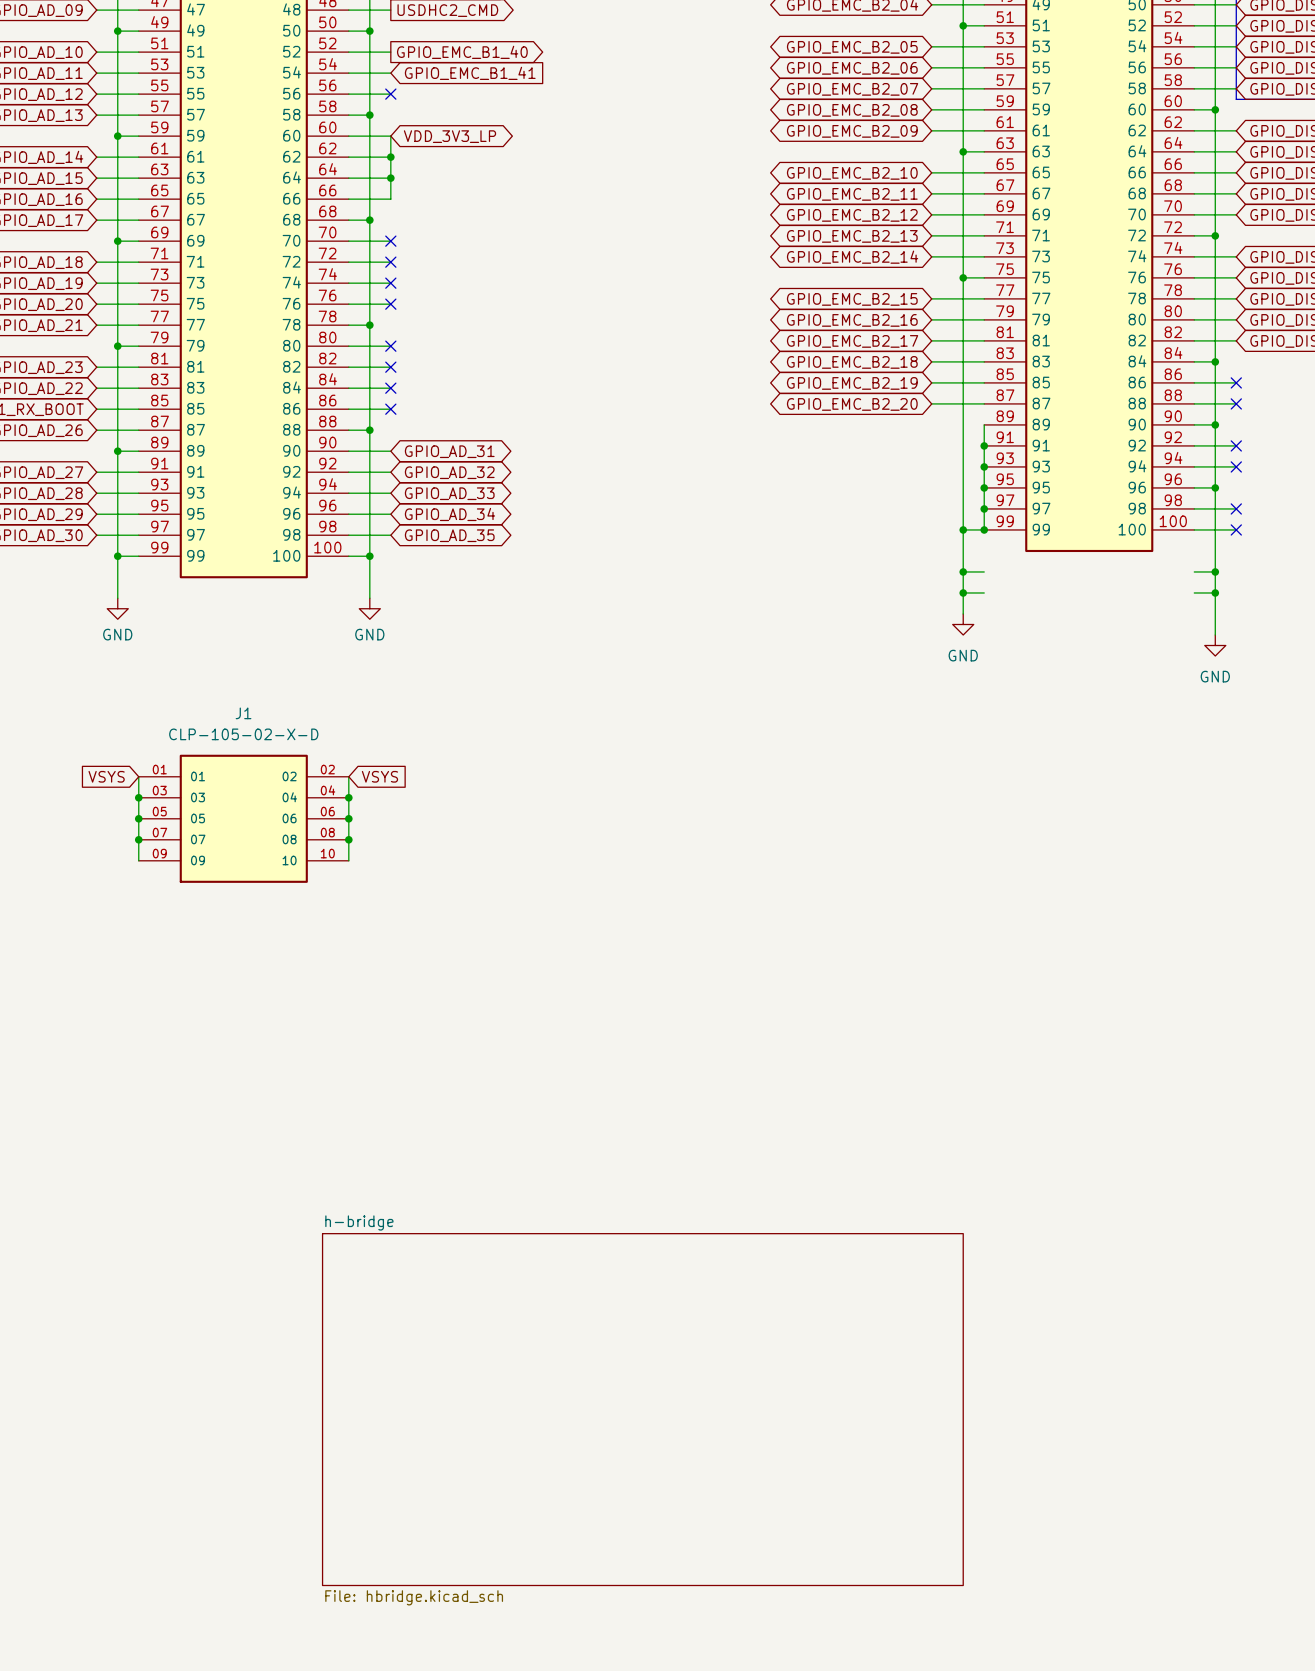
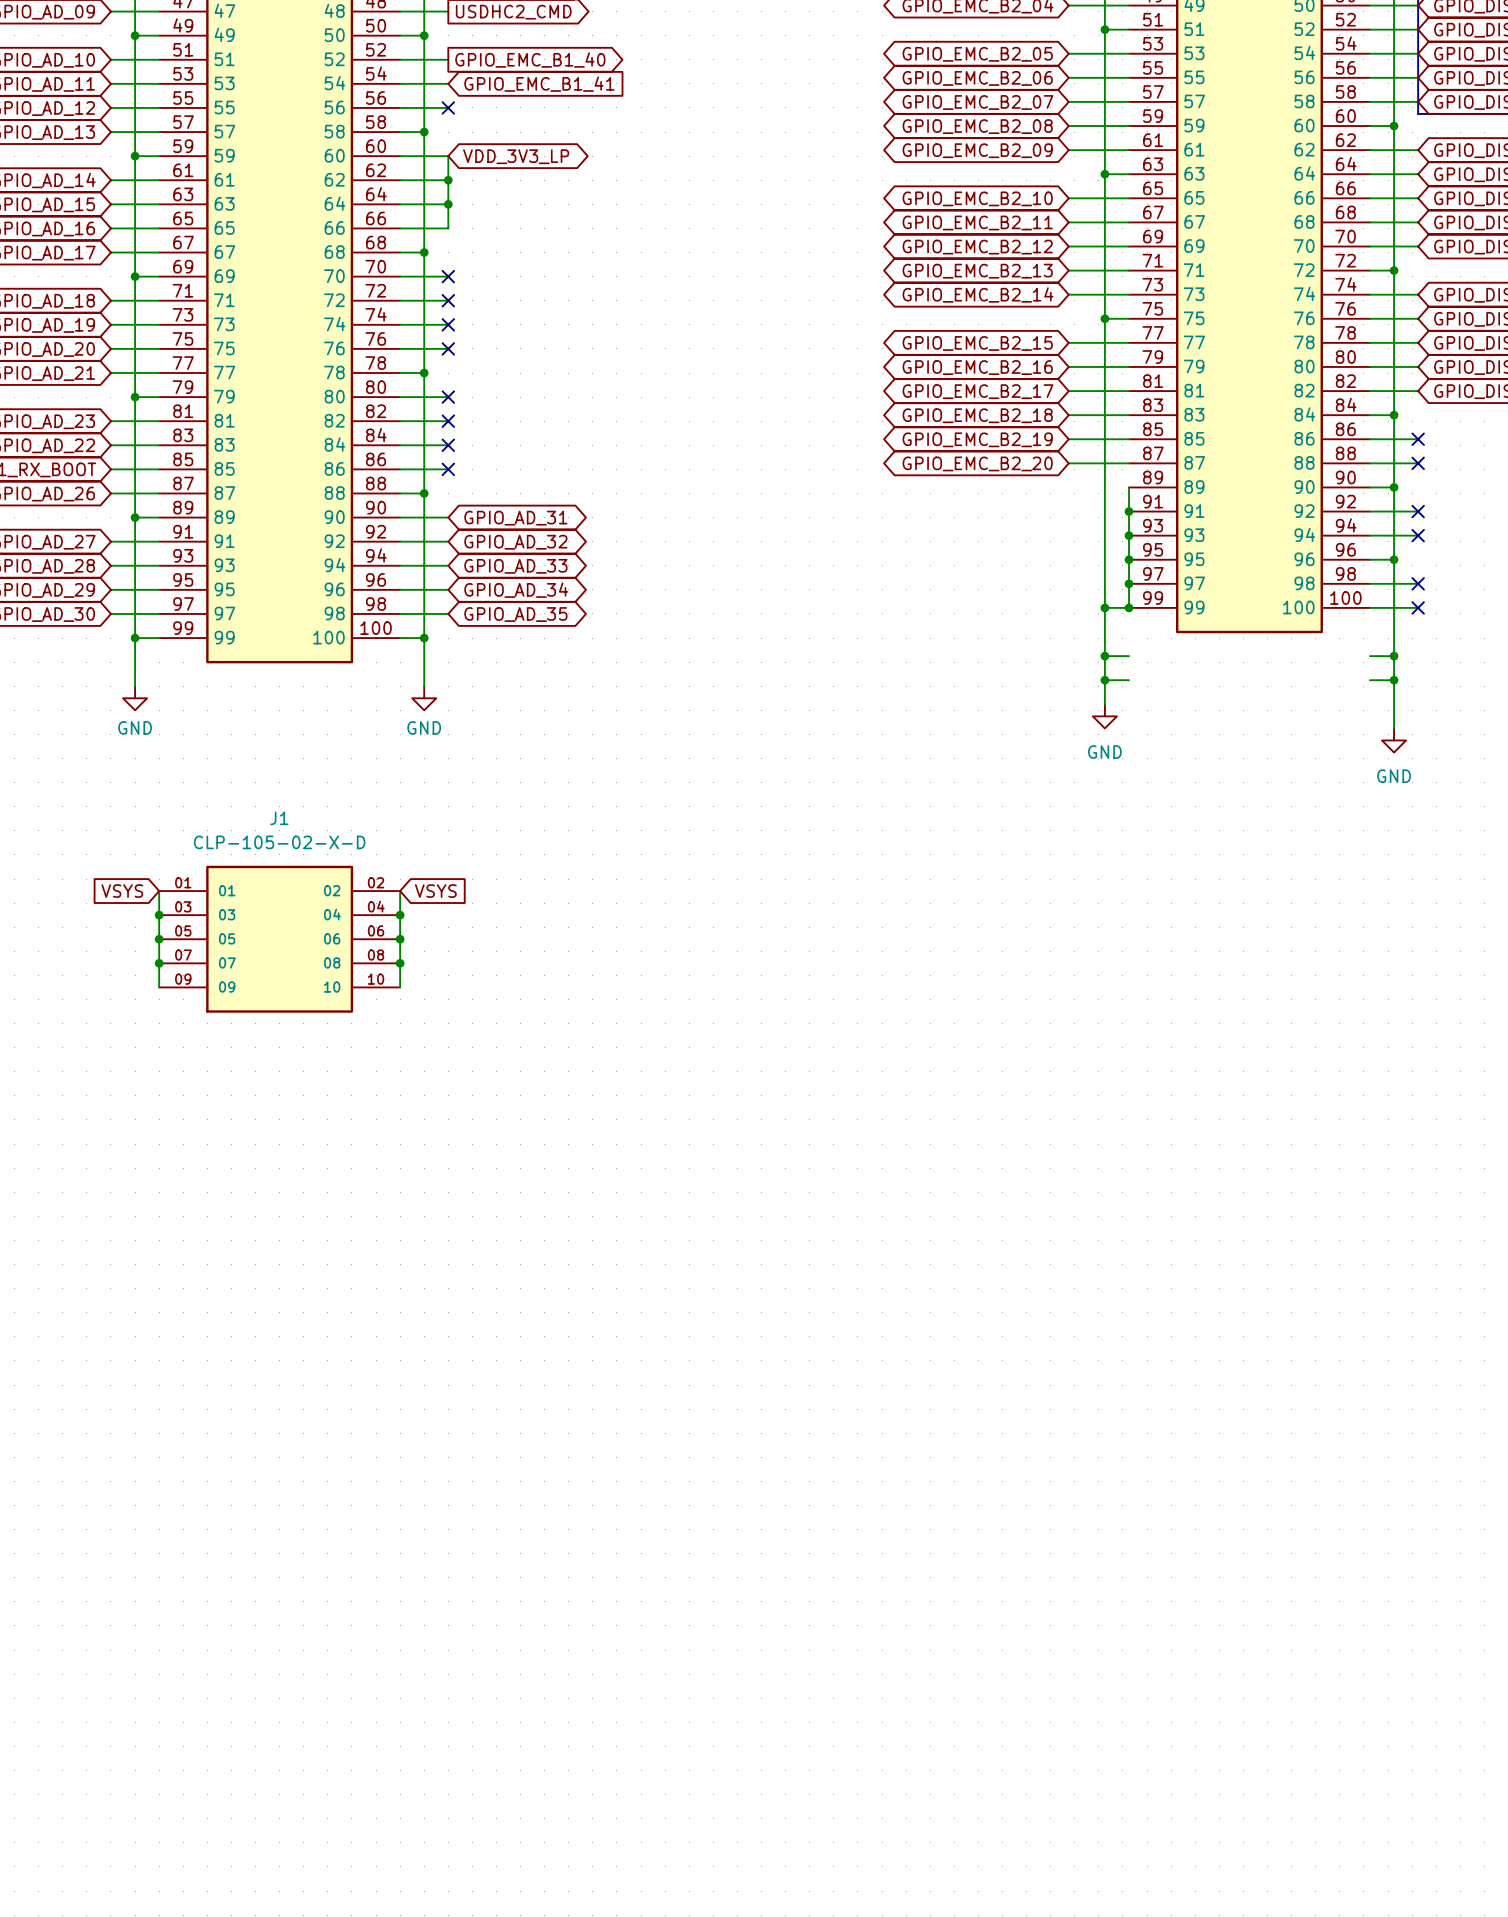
sheet h-bridge: File: hbridge.kicad_sch (642, 1409) -> none

